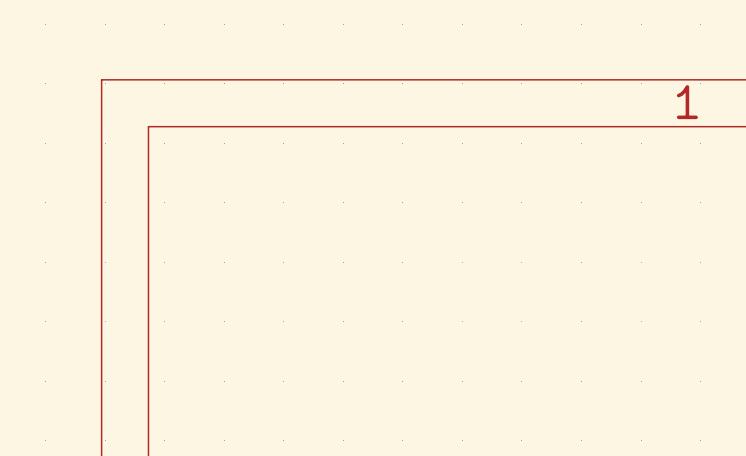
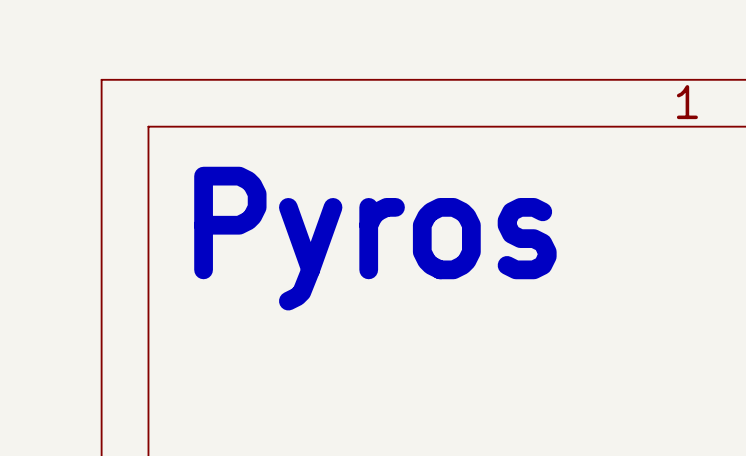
text: none -> Pyros (375, 238)

